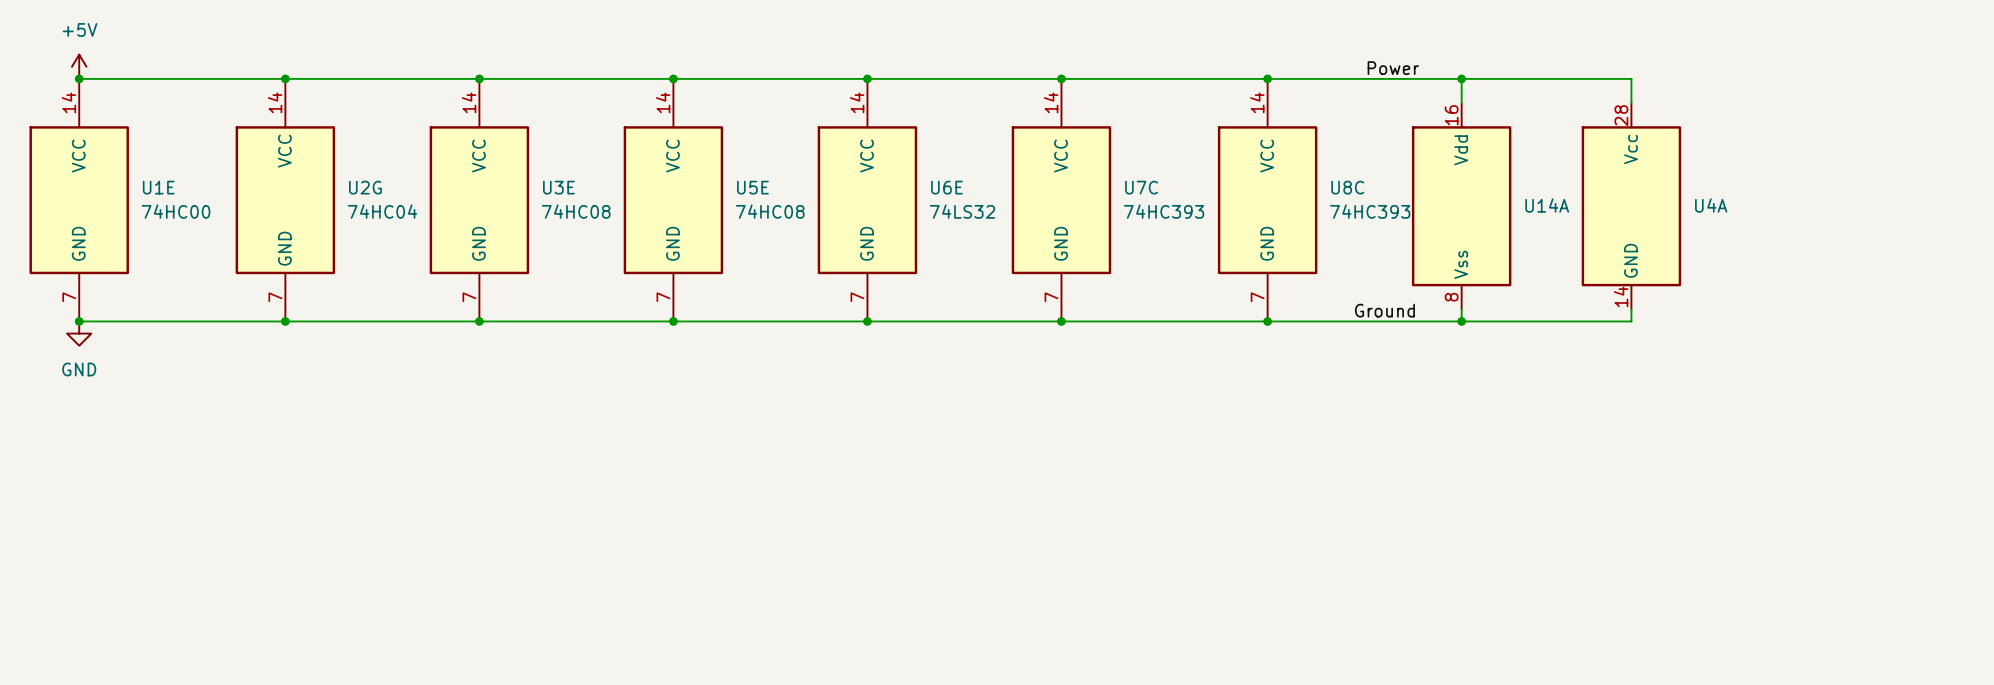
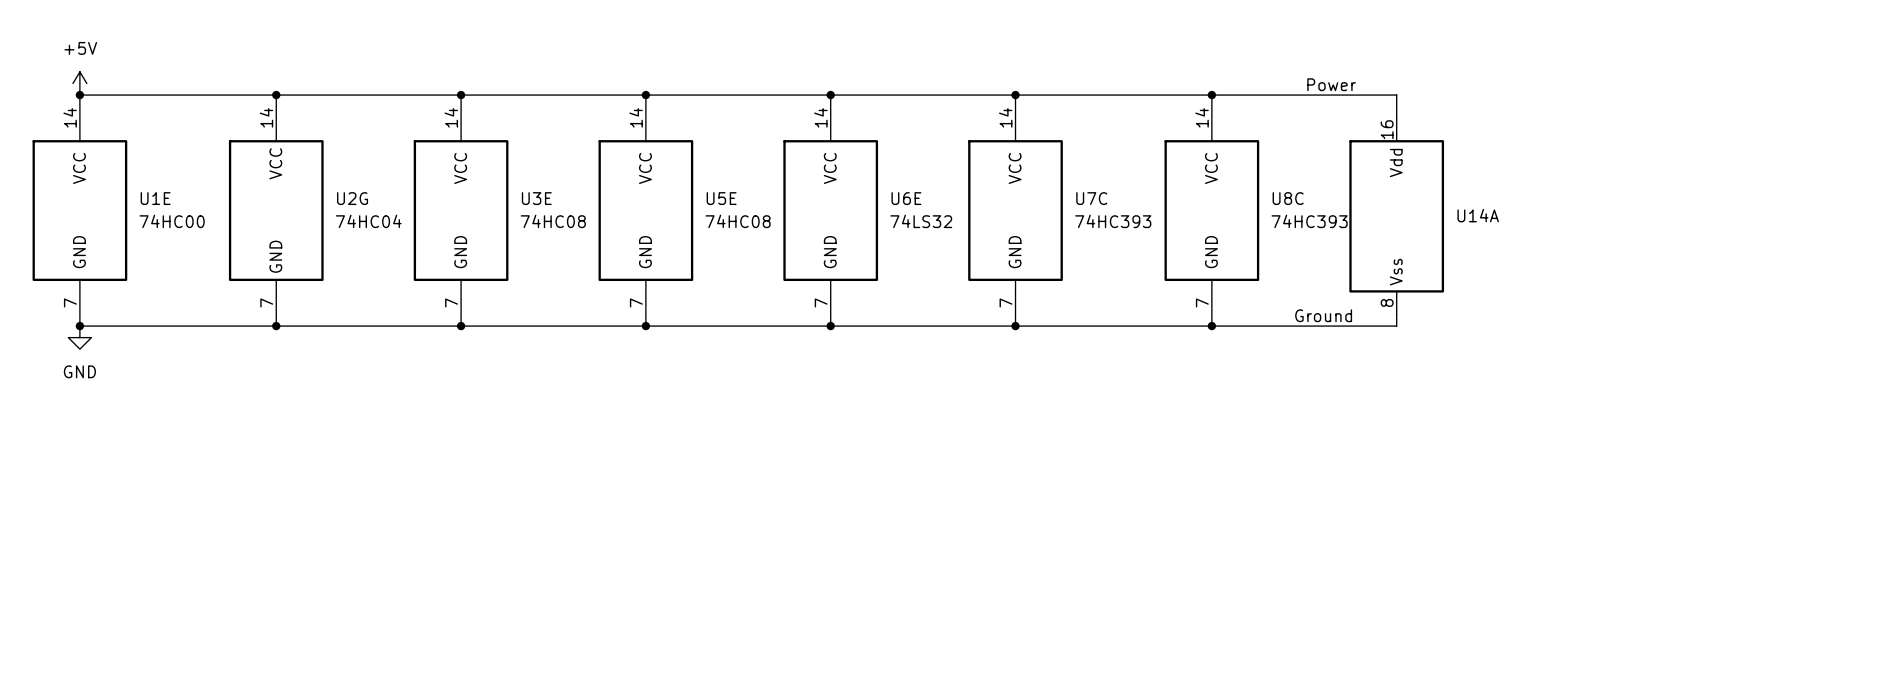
wire: (1461, 78) (1631, 78) (1631, 103) -> none
junction: (1461, 78) -> none
U4A: (1631, 206) -> none
wire: (1631, 309) (1631, 321) (1461, 321) -> none
junction: (1461, 321) -> none

